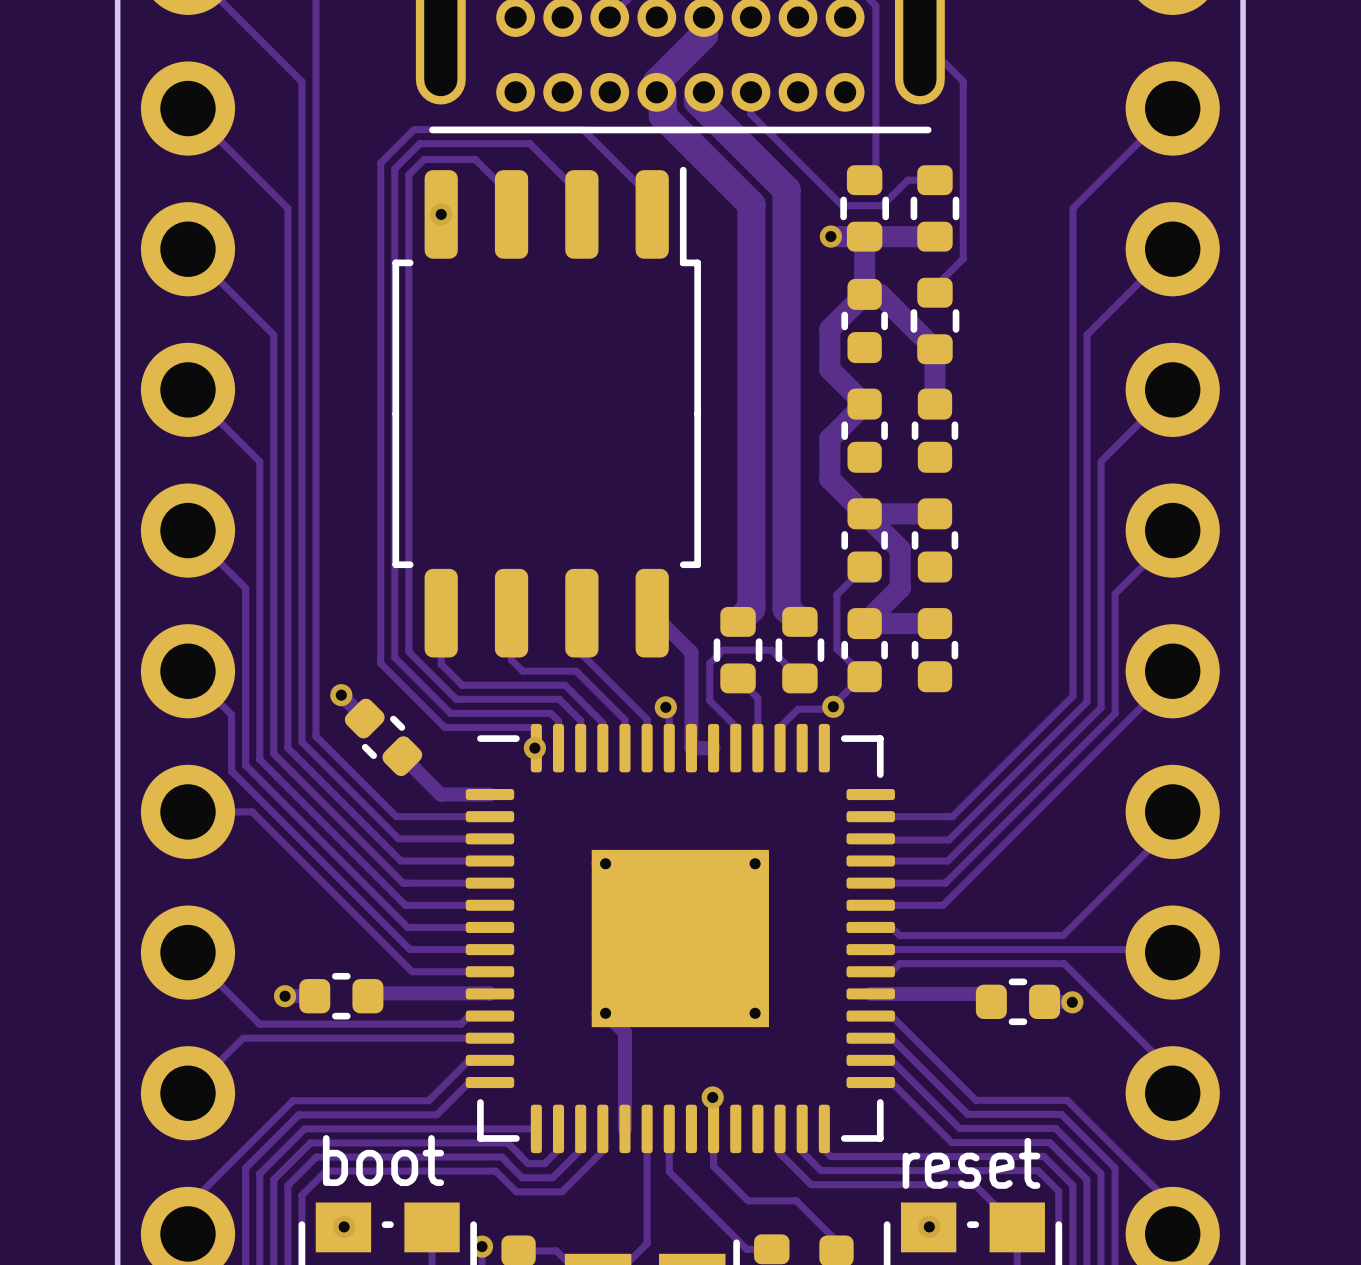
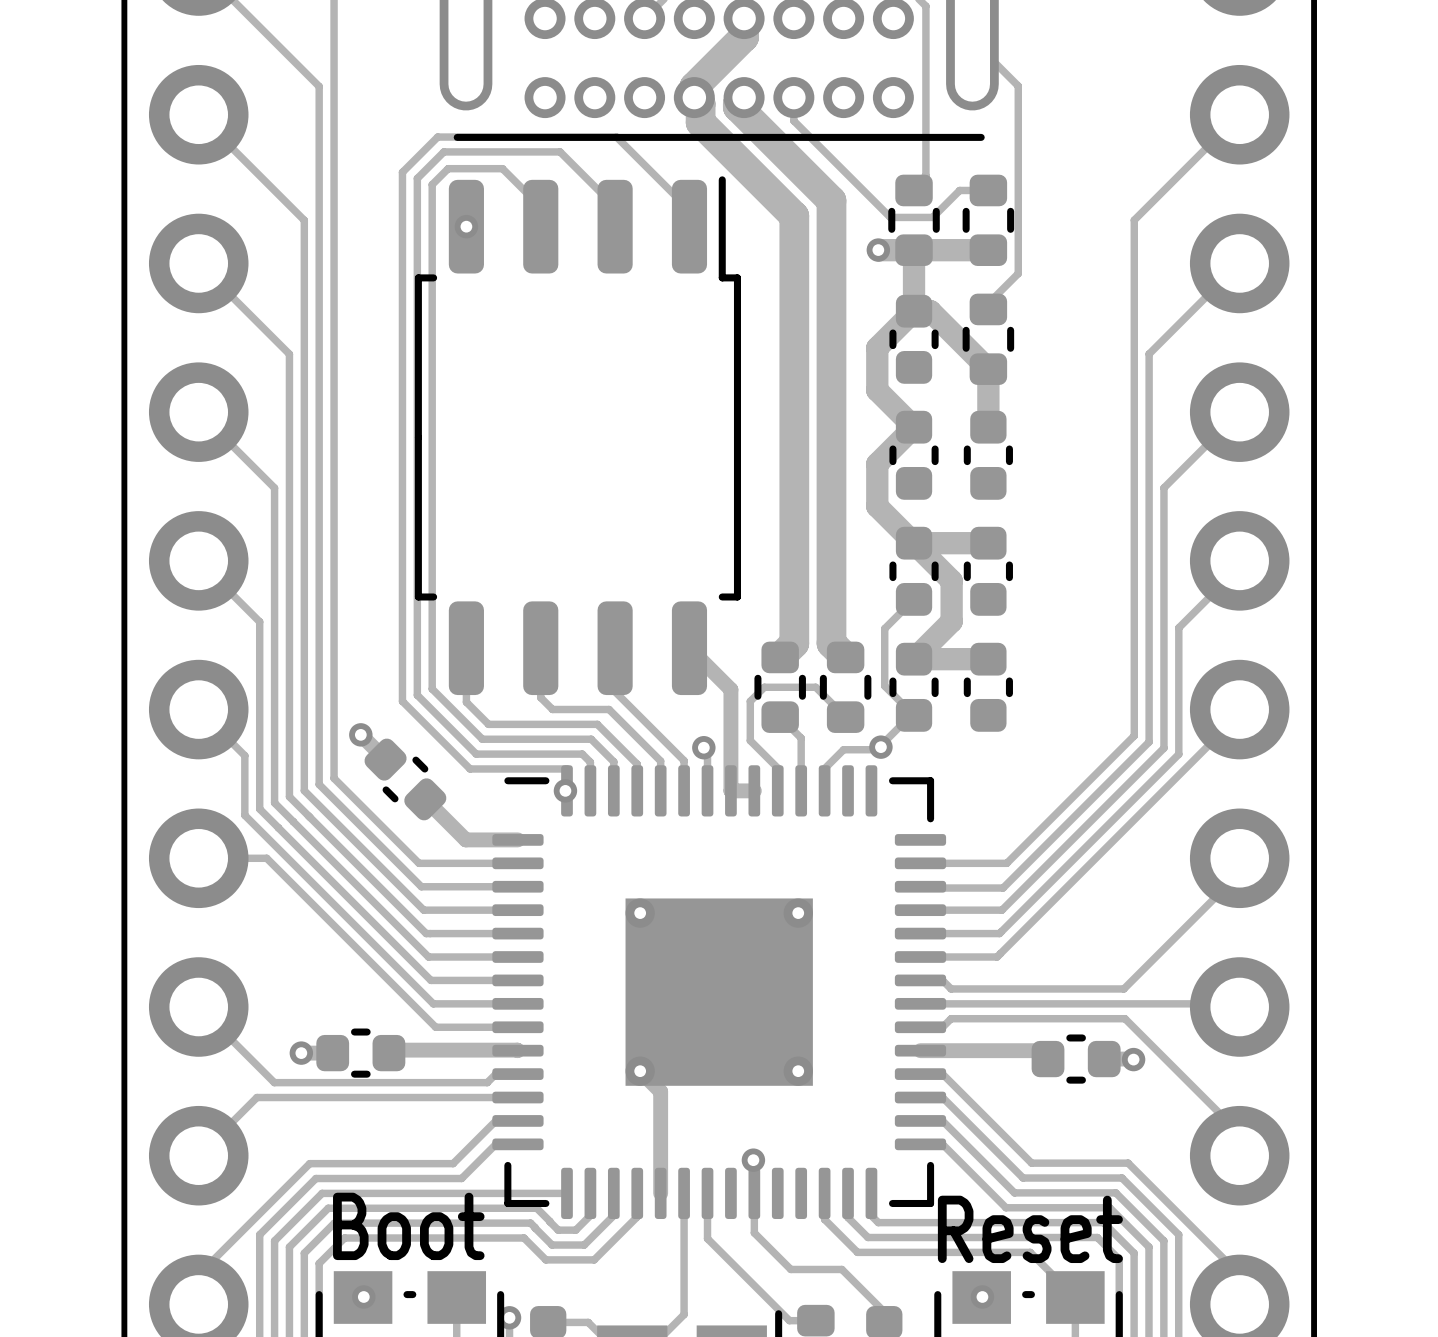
text: boot (383, 1160) -> Boot (408, 1226)
text: reset (971, 1163) -> Reset (1030, 1229)

